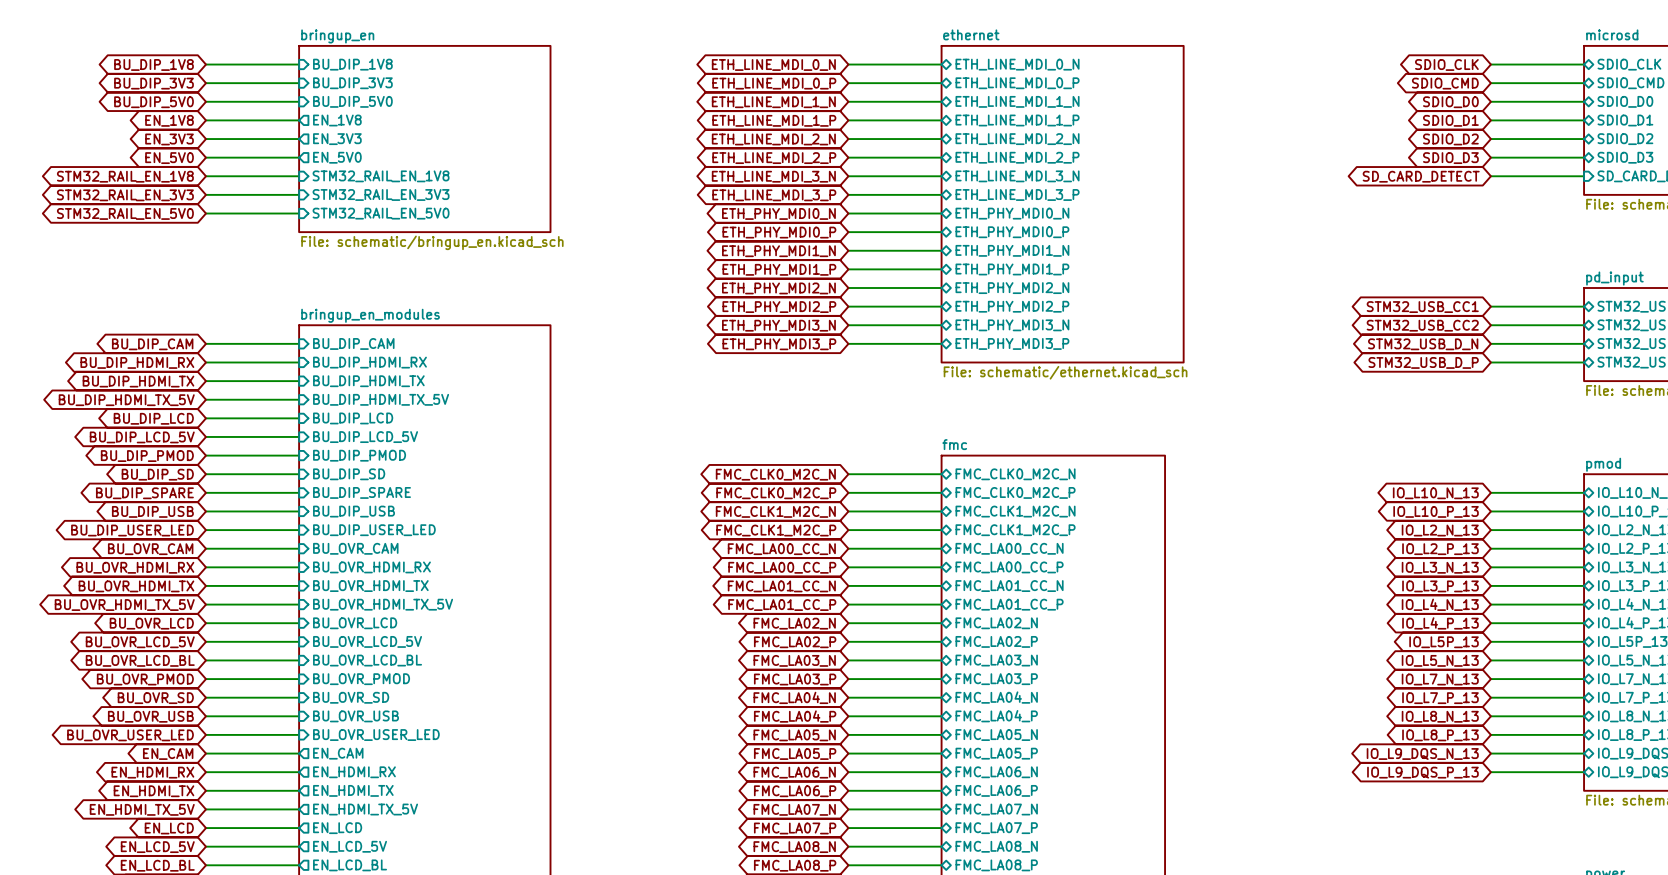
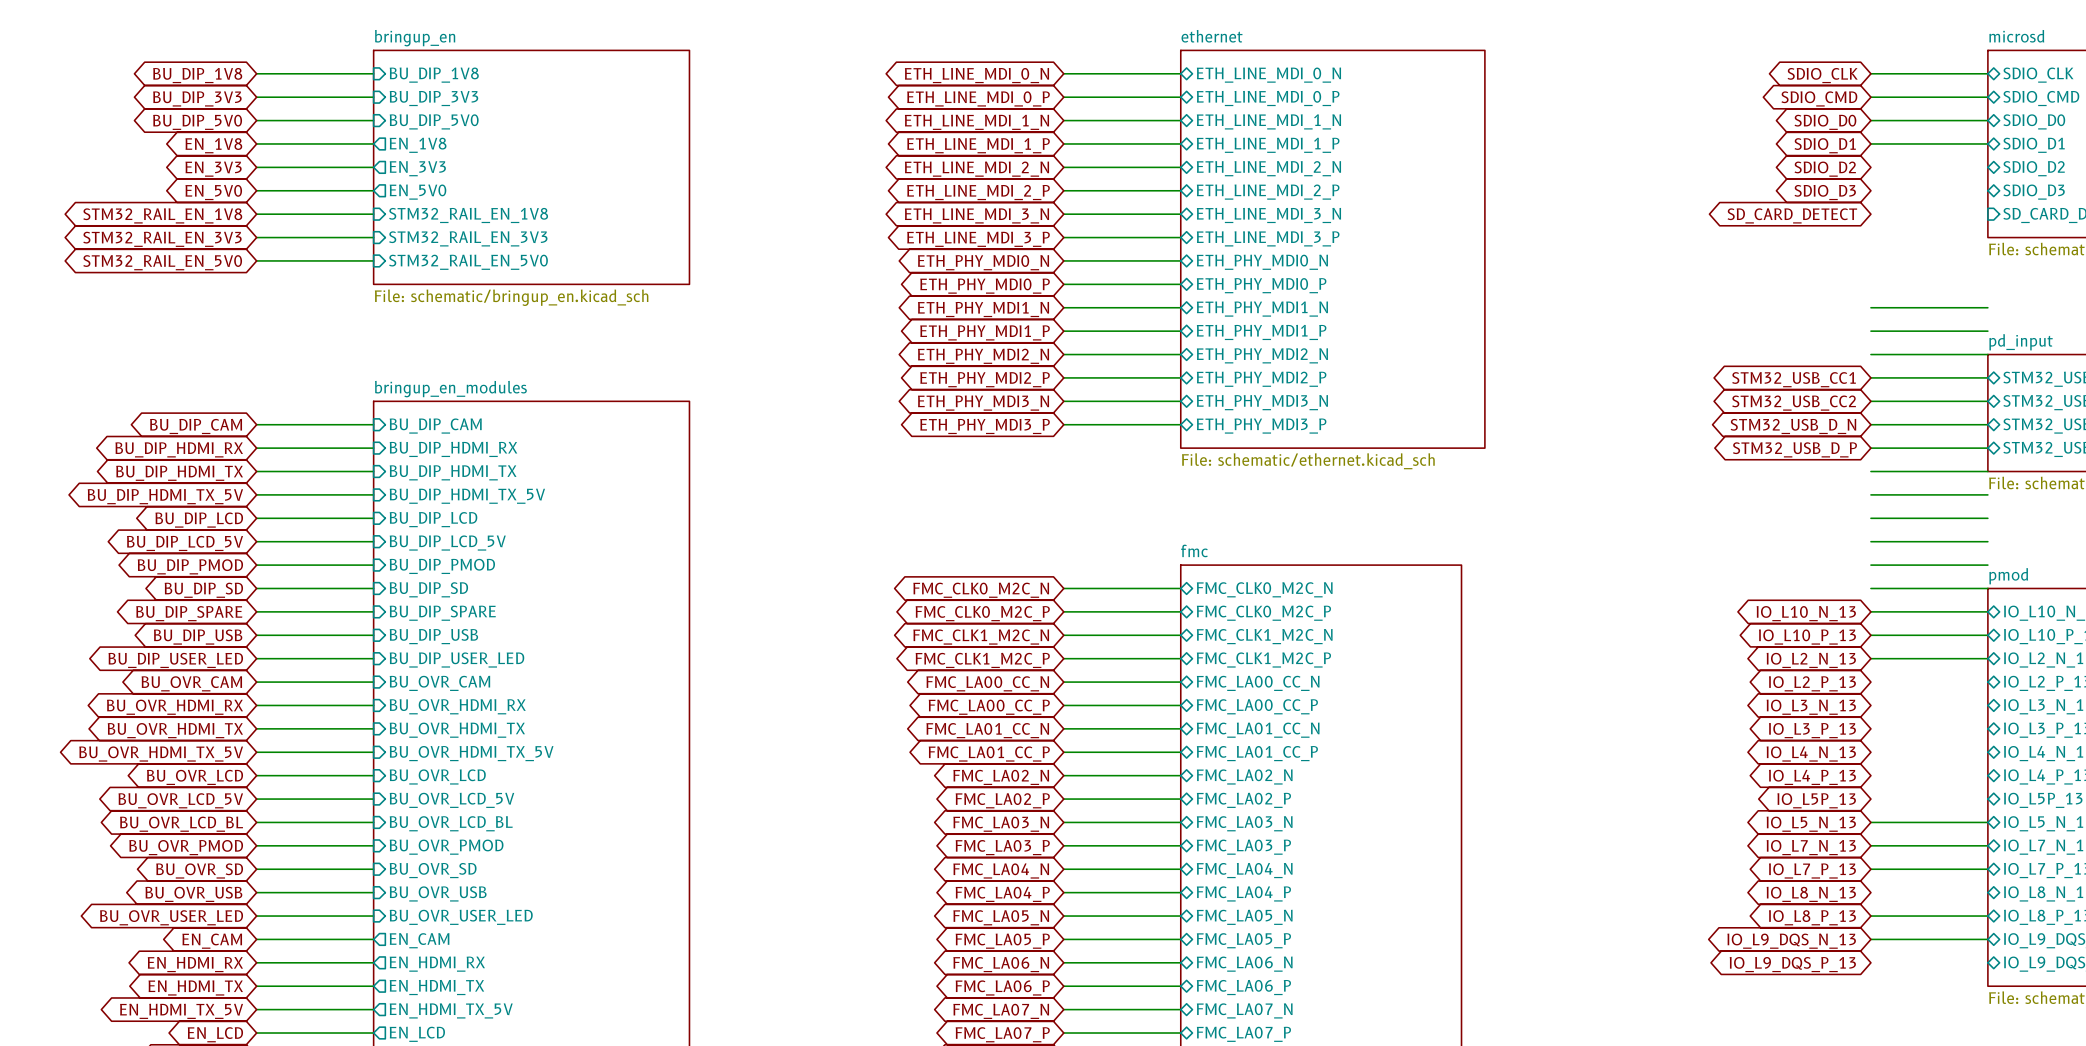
wire: (1490, 139) (1584, 139) -> (1870, 307) (1987, 307)
wire: (1490, 157) (1584, 157) -> (1870, 331) (1987, 331)
wire: (1490, 176) (1584, 176) -> (1870, 354) (1987, 354)
wire: (1490, 548) (1584, 548) -> (1870, 471) (1987, 471)
wire: (1490, 567) (1584, 567) -> (1870, 494) (1987, 494)
wire: (1490, 585) (1584, 585) -> (1870, 518) (1987, 518)
wire: (1490, 604) (1584, 604) -> (1870, 541) (1987, 541)
wire: (1490, 623) (1584, 623) -> (1870, 565) (1987, 565)
wire: (1490, 641) (1584, 641) -> (1870, 588) (1987, 588)
wire: (1490, 716) (1584, 716) -> none
wire: (1490, 772) (1584, 772) -> none

